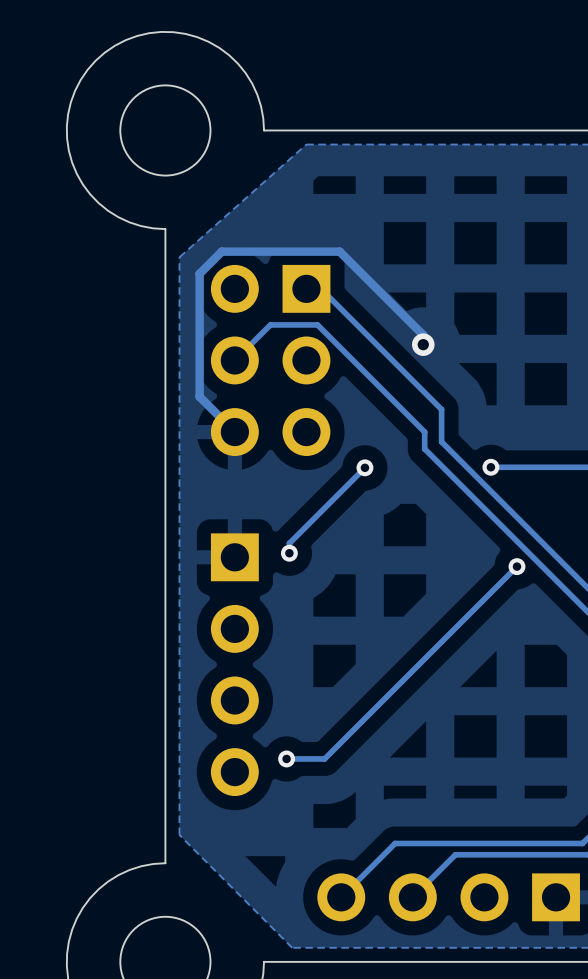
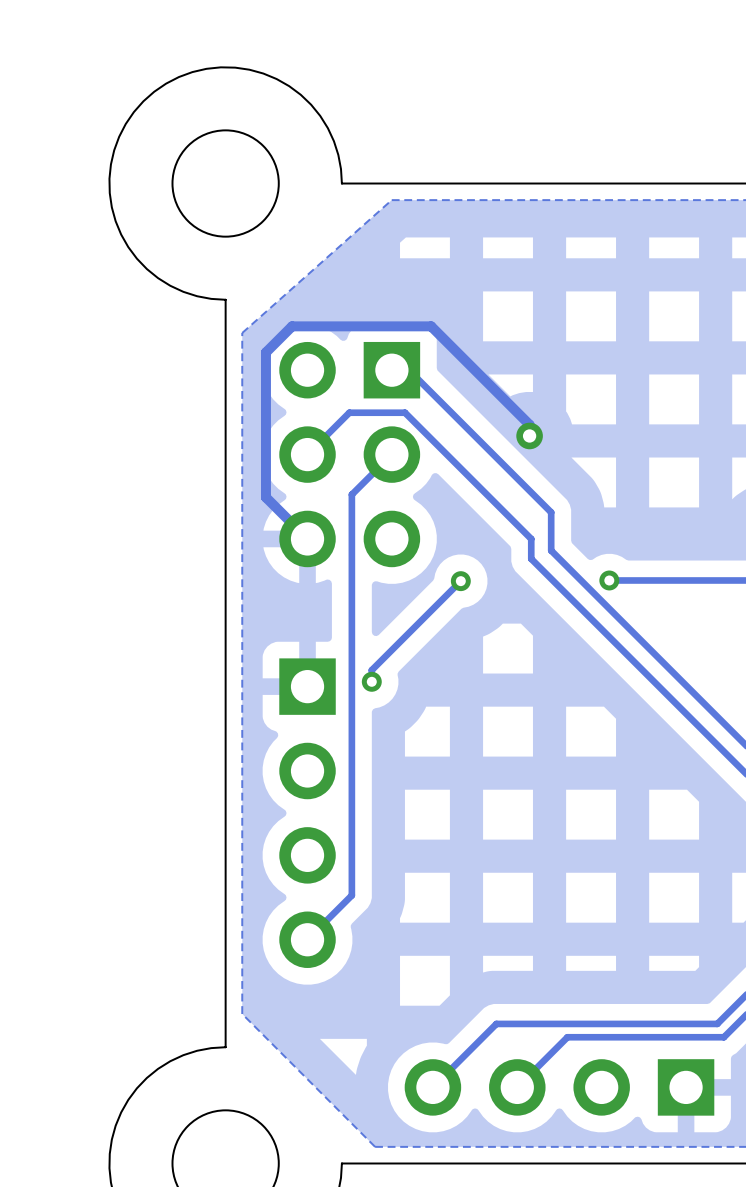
track: none -> (391, 454) (351, 494) (351, 895) (307, 939)
track: (516, 566) (324, 758) (286, 758) -> none
via: (516, 566) -> none
via: (286, 758) -> none

